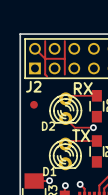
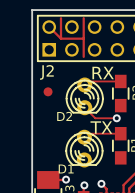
track: (45, 58) (45, 74) (47, 76) -> none

